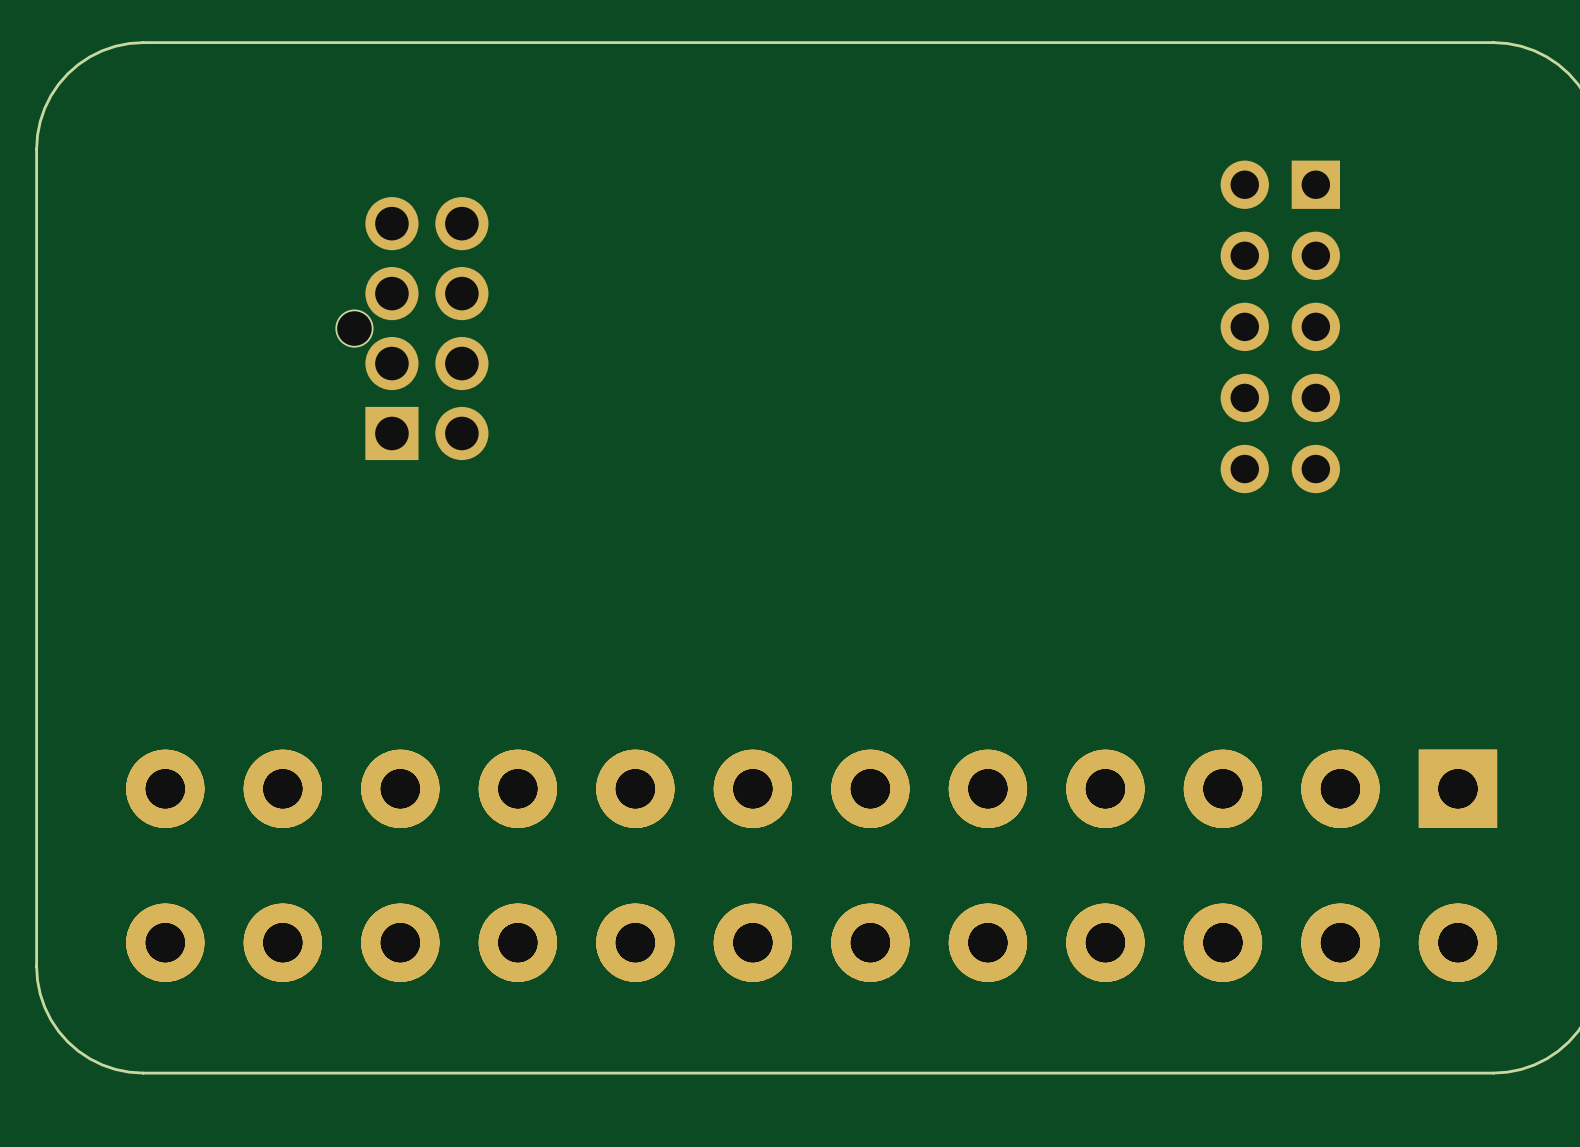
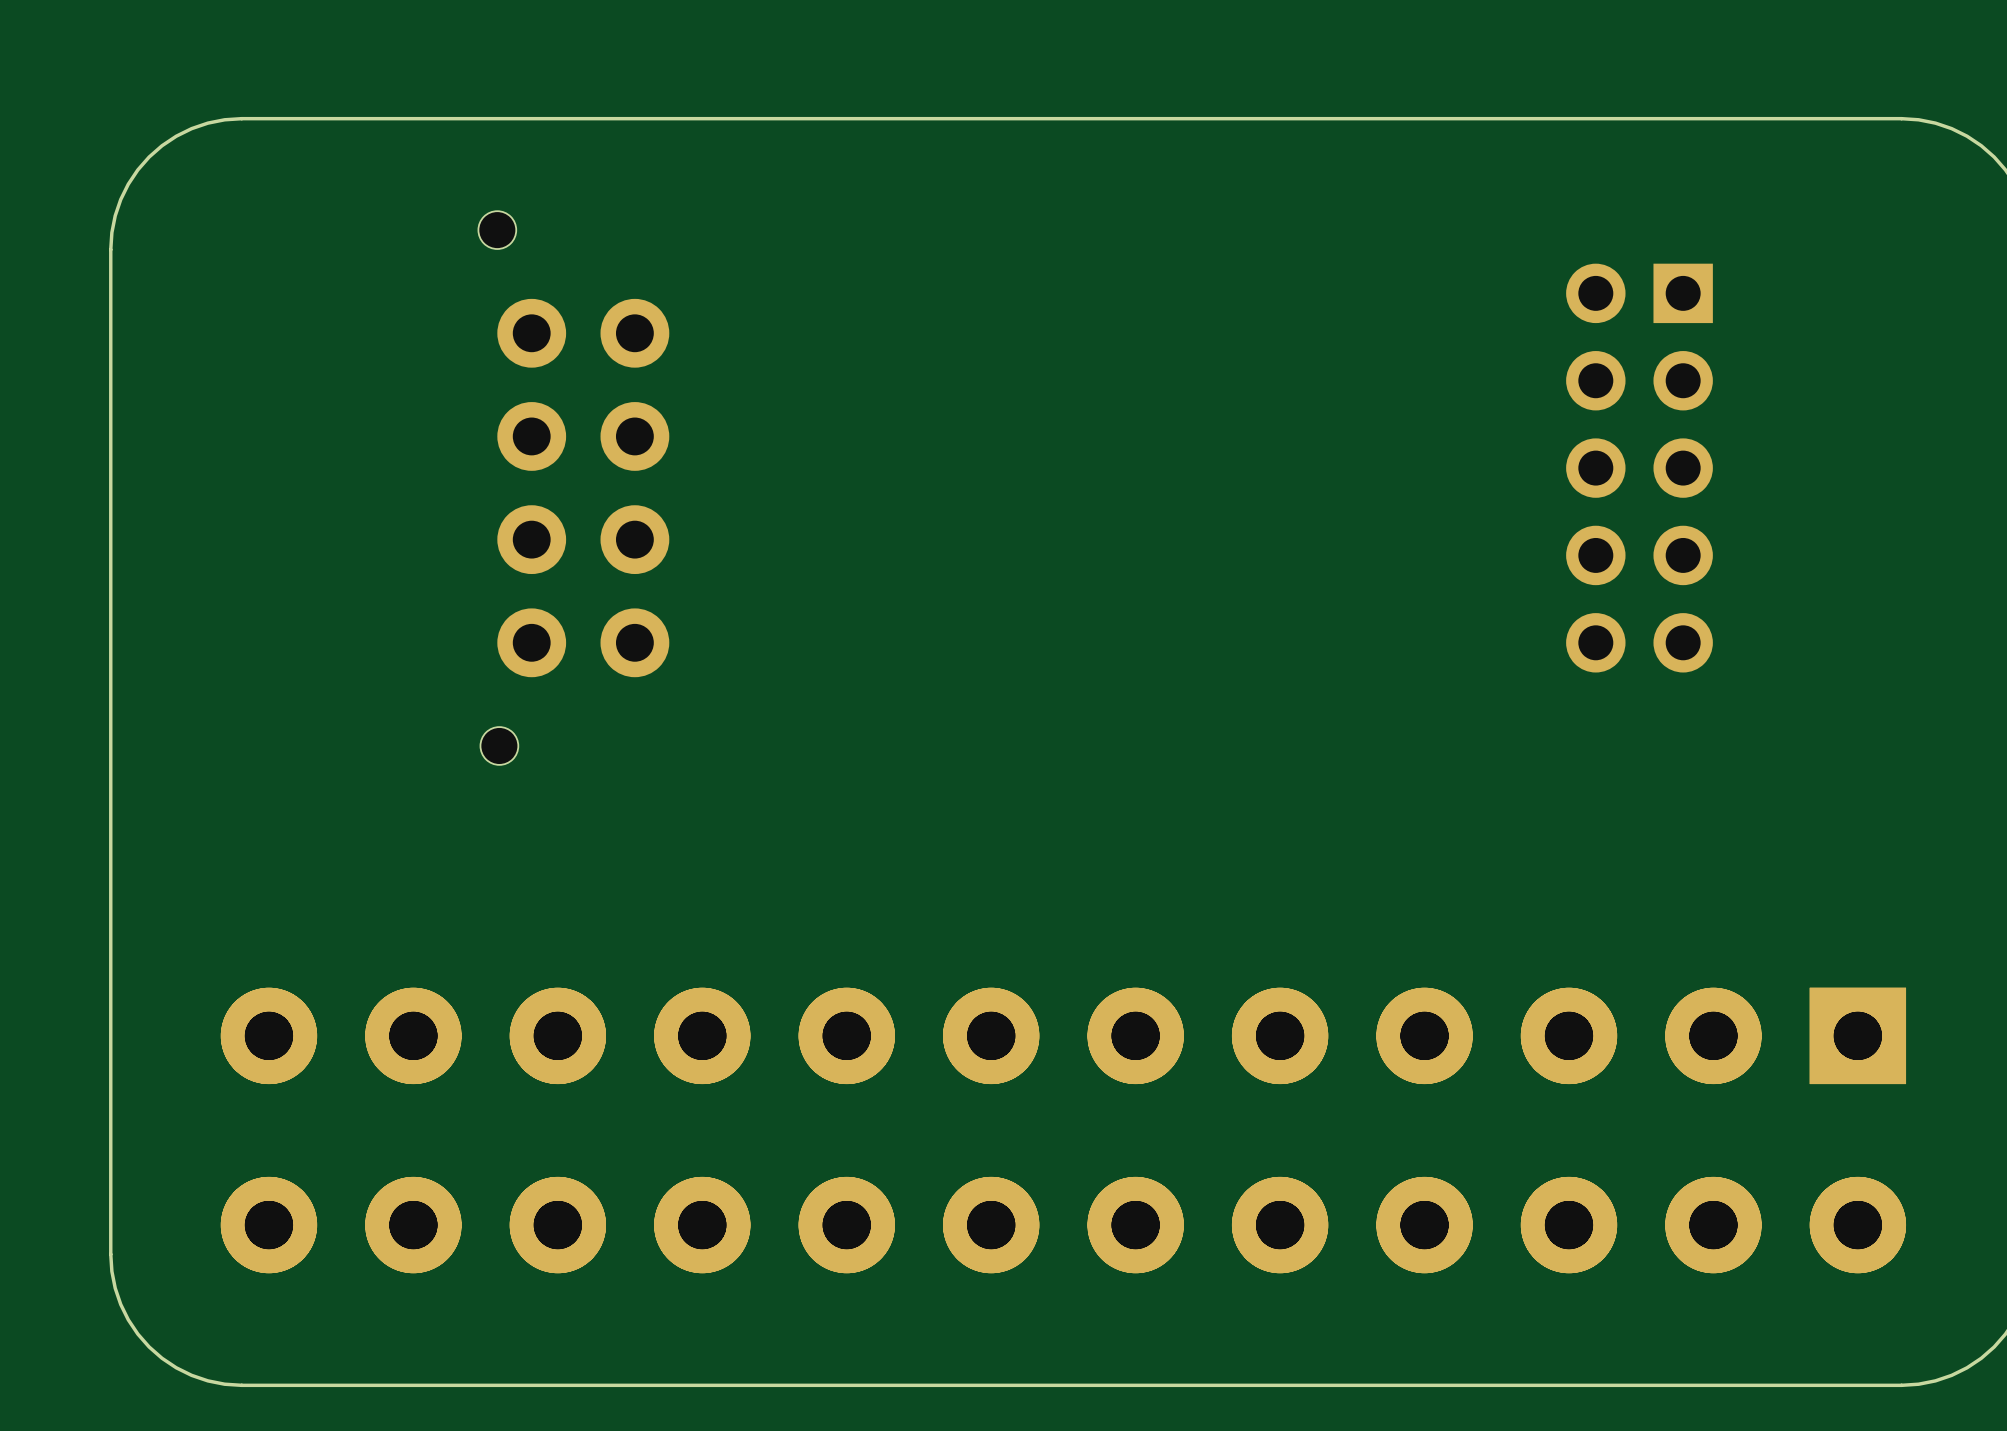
part footprint: [336, 197, 489, 461] -> [478, 211, 670, 765]

